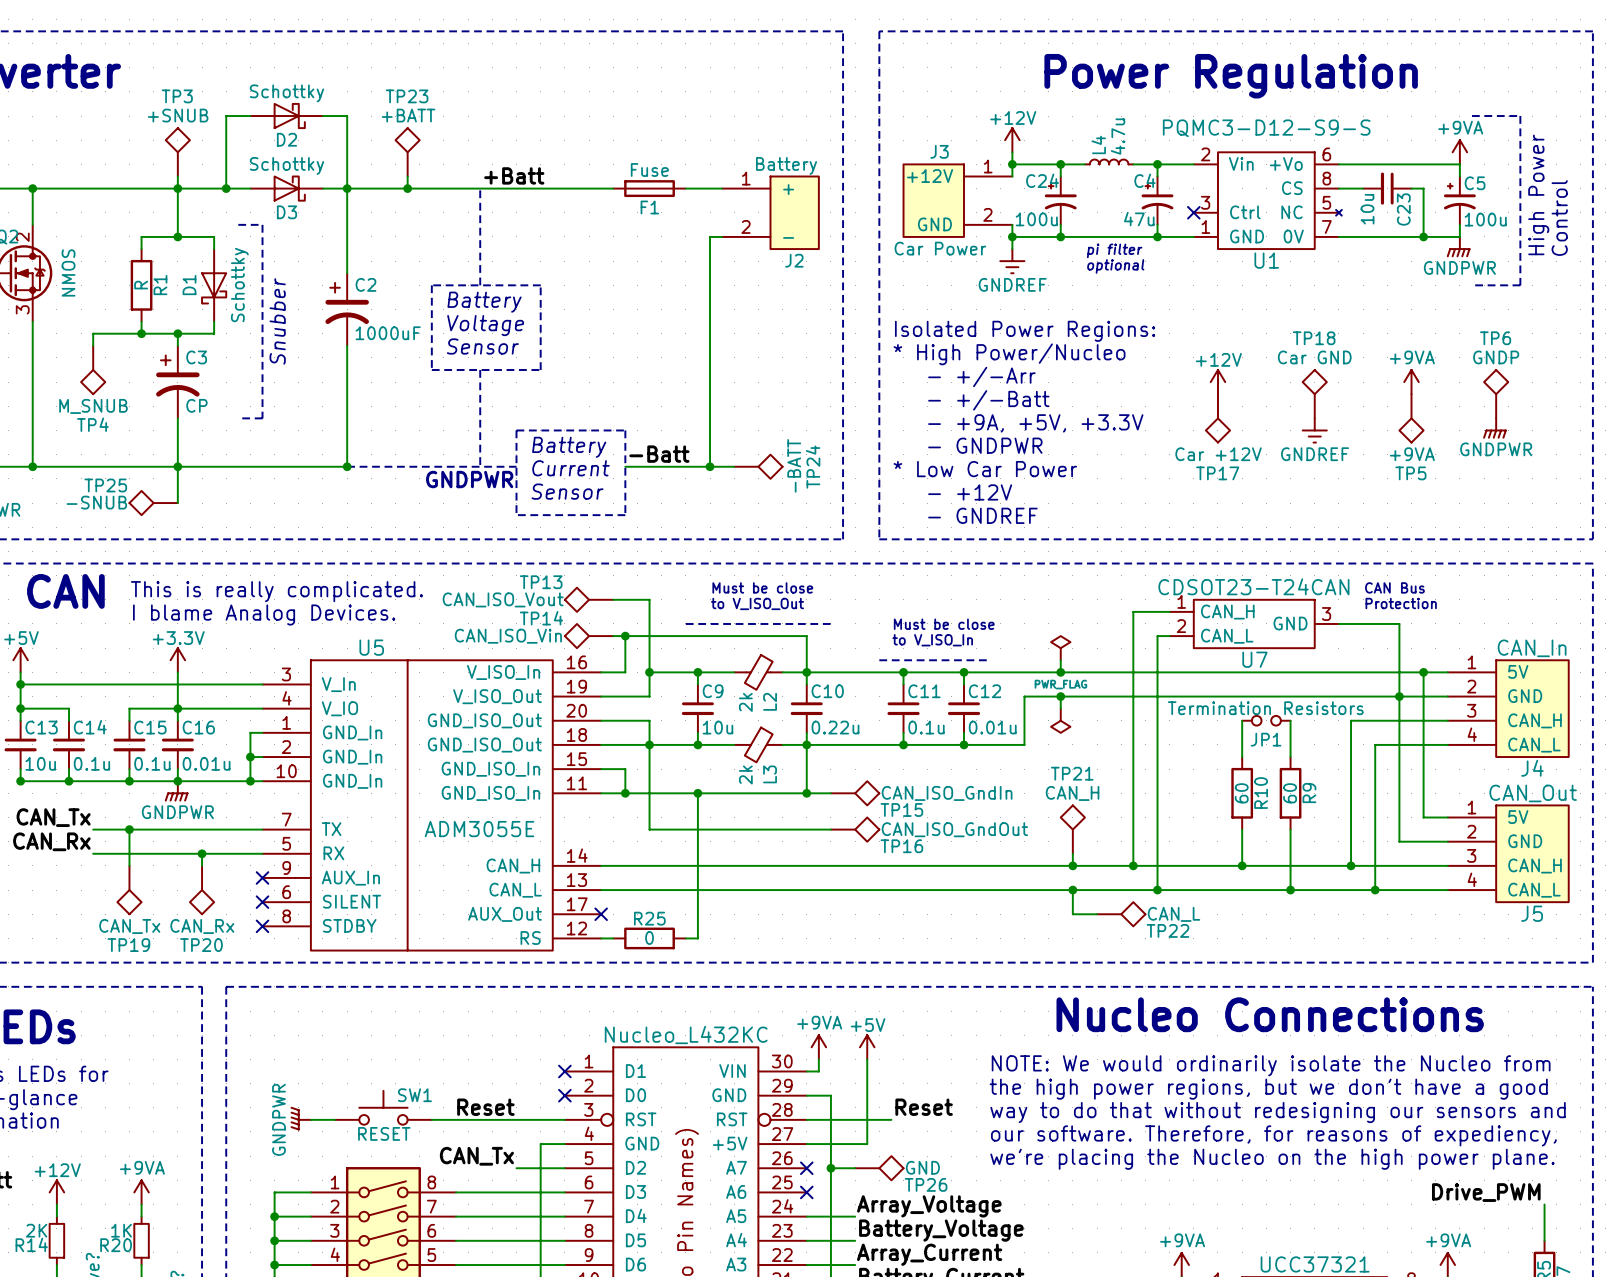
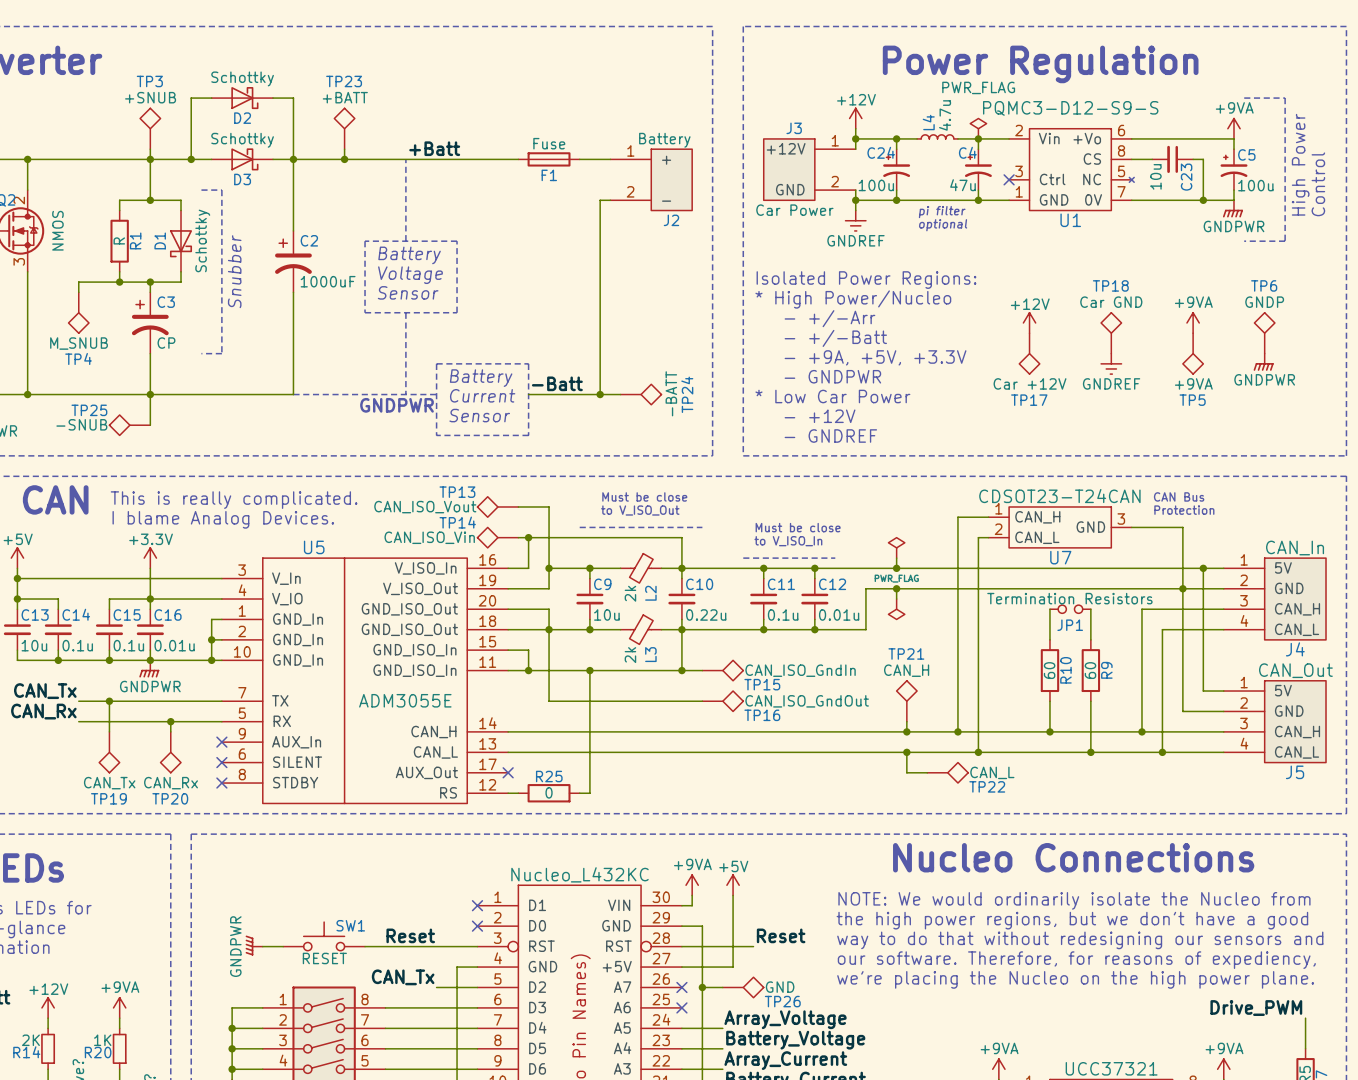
power symbol: none -> PWR_FLAG (978, 128)
junction: (347, 466) -> none
junction: (20, 781) -> none

